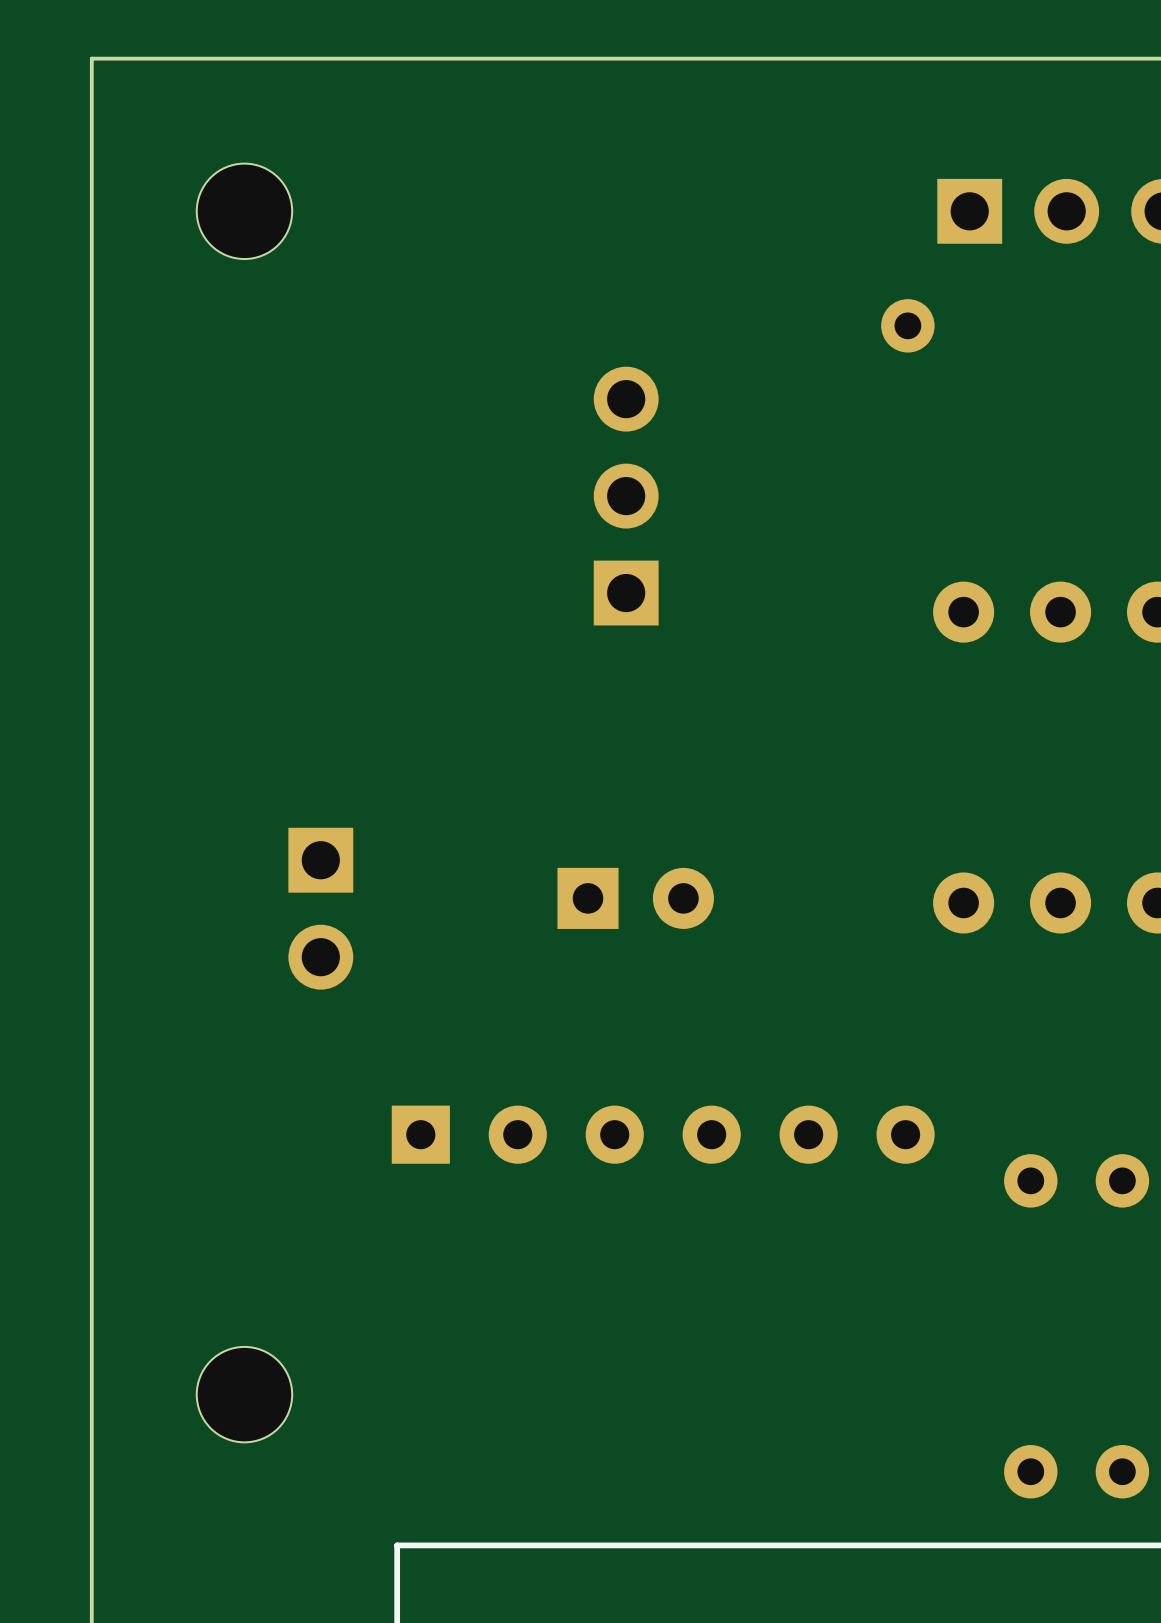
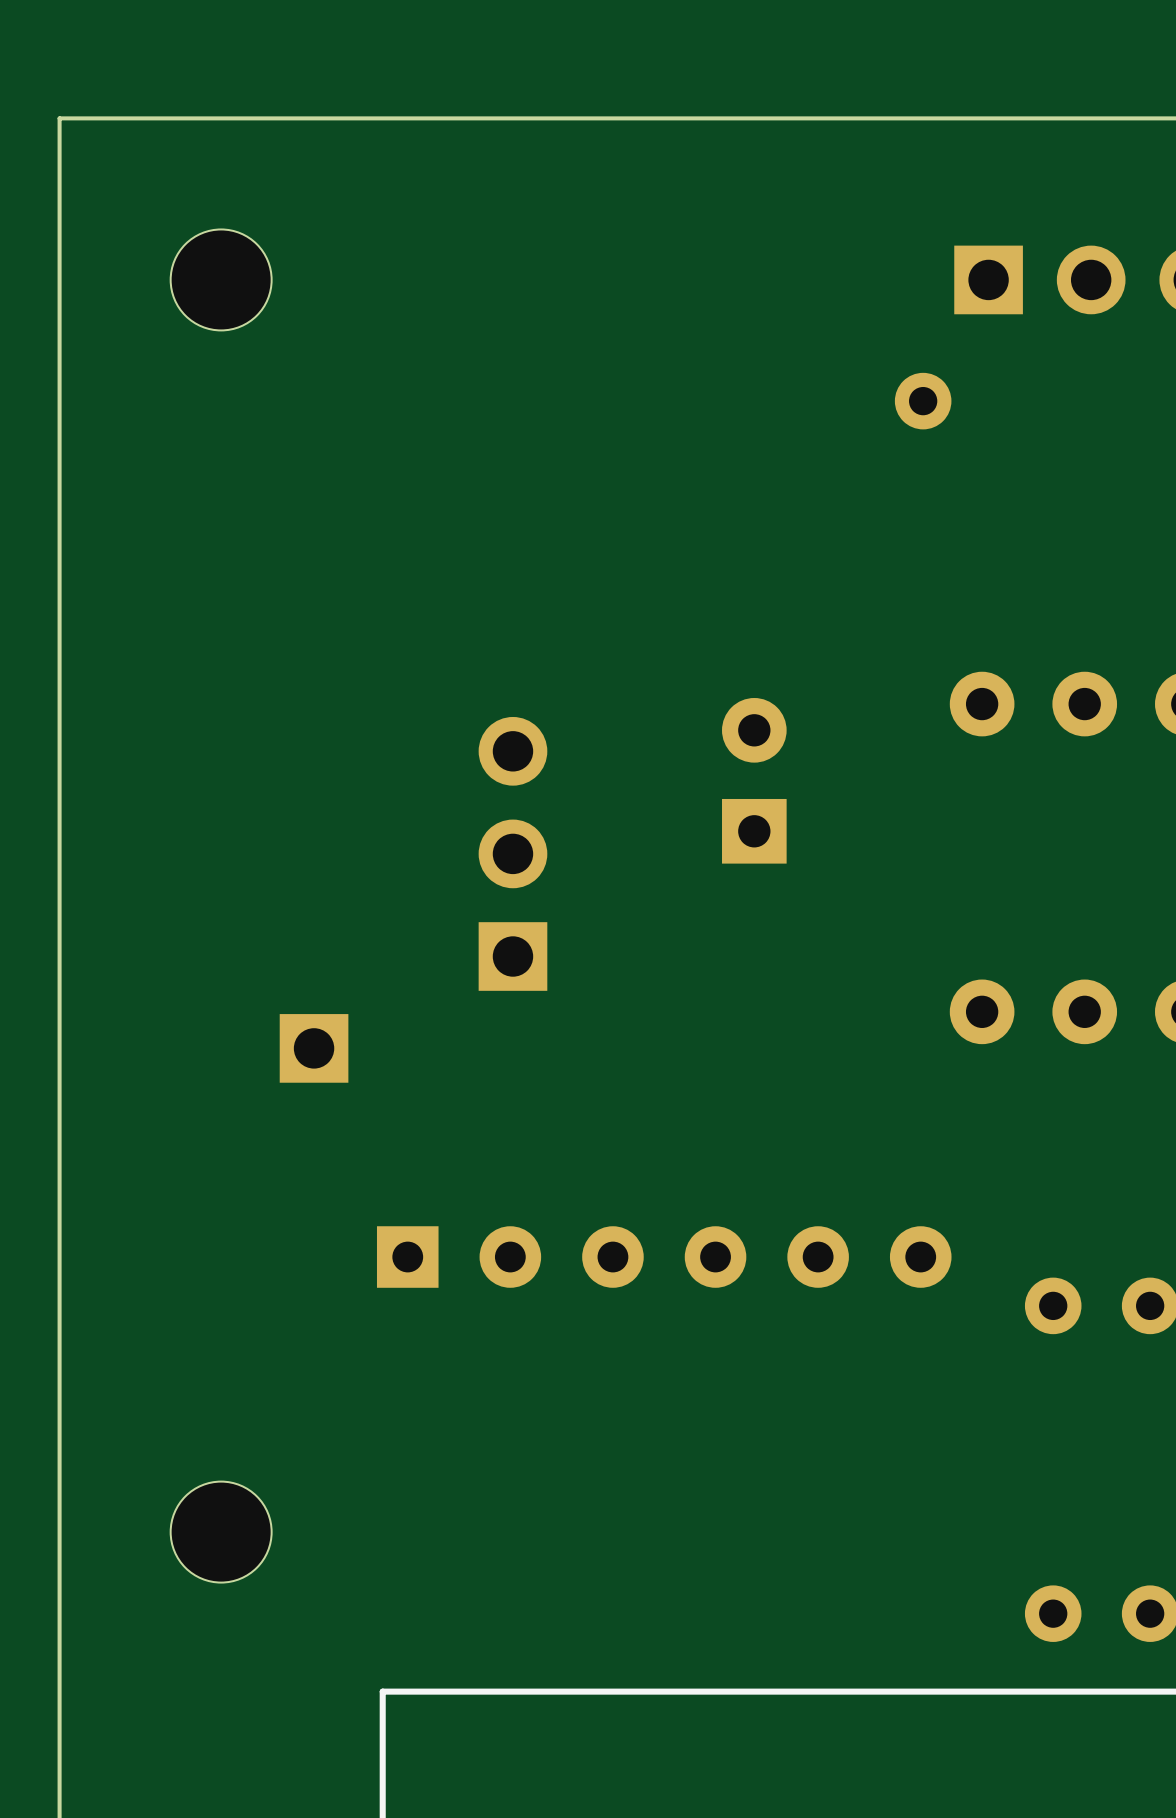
part position: (626, 496) -> (512, 853)
part footprint: [288, 827, 354, 990] -> [279, 1014, 349, 1083]
part rotation: 0° (635, 898) -> 90° counterclockwise (754, 780)
part position: (635, 898) -> (754, 780)

